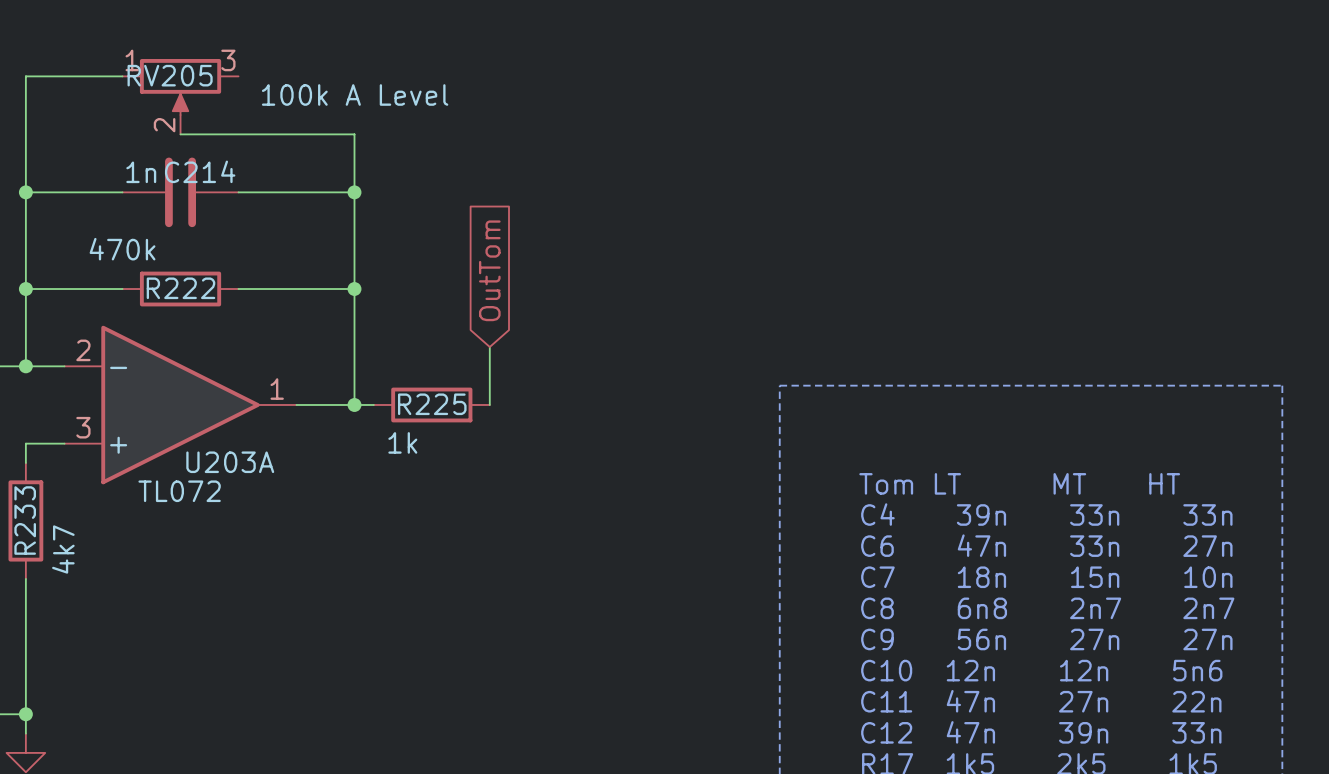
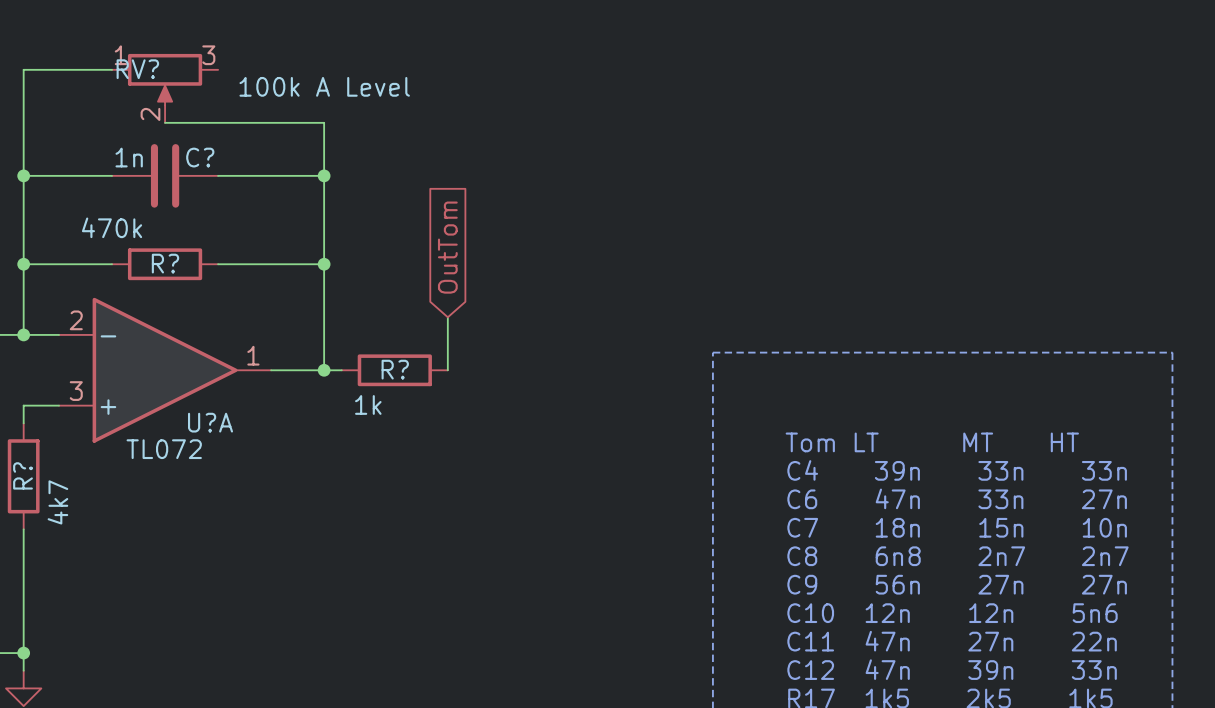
RV205 name: RV205 (170, 75) -> RV? (137, 69)
C214 name: C214 (200, 171) -> C? (200, 157)
R222 name: R222 (180, 288) -> R? (165, 263)
R225 name: R225 (432, 404) -> R? (395, 369)
U203A name: U203A (230, 462) -> U?A (210, 422)
R233 name: R233 (25, 520) -> R? (23, 475)

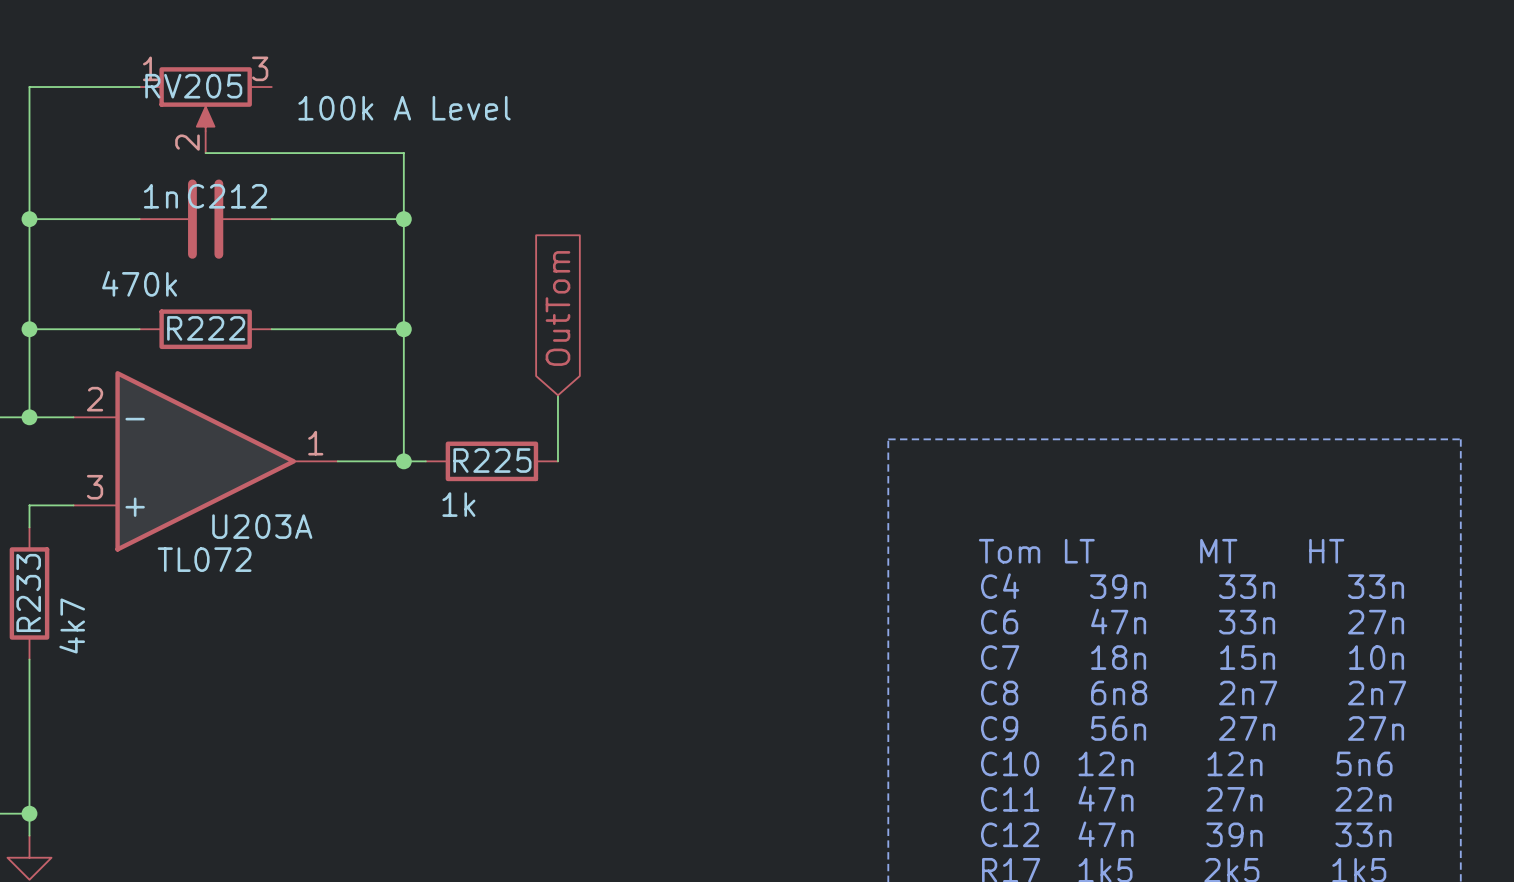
RV? name: RV? (137, 69) -> RV205 (193, 86)
C? name: C? (200, 157) -> C212 (227, 196)
R? name: R? (165, 263) -> R222 (206, 328)
R? name: R? (395, 369) -> R225 (492, 460)
U?A name: U?A (210, 422) -> U203A (262, 526)
R? name: R? (23, 475) -> R233 (28, 592)

